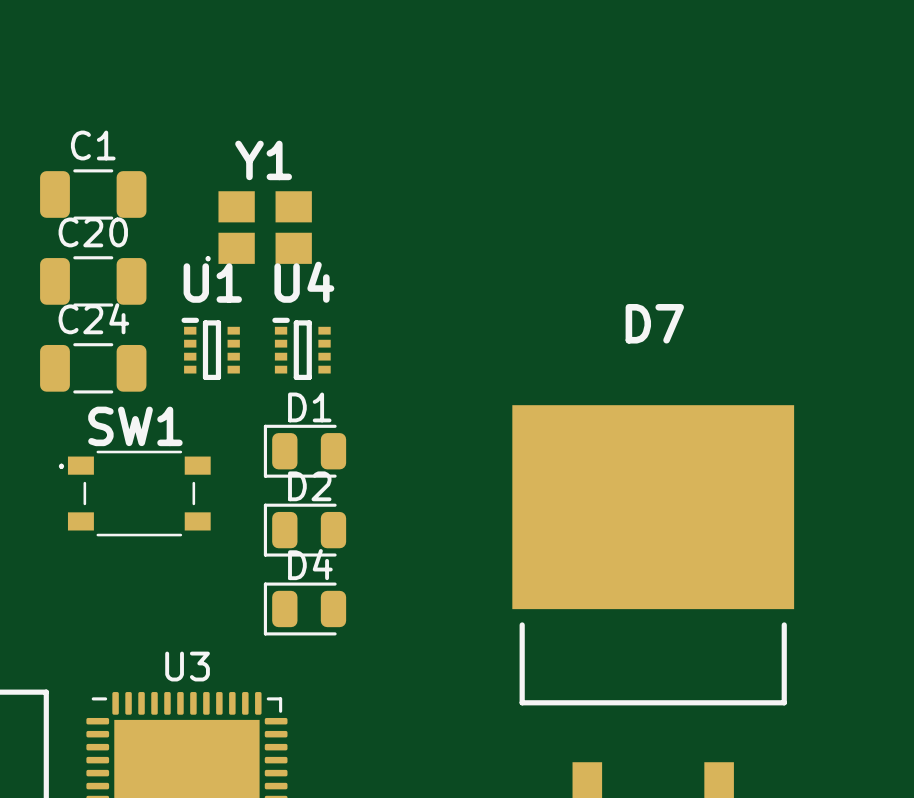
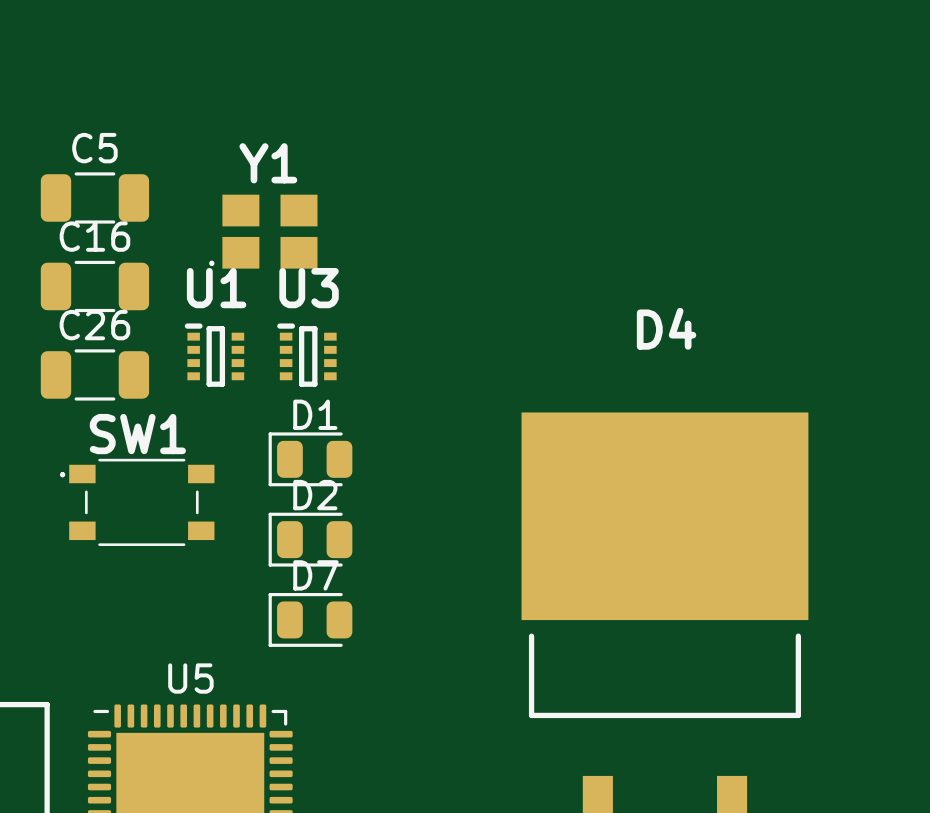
C1 name: C1 (93, 145) -> C5 (94, 148)
C20 name: C20 (93, 232) -> C16 (94, 236)
U4 name: U4 (304, 282) -> U3 (309, 288)
C24 name: C24 (93, 318) -> C26 (94, 325)
D7 name: D7 (654, 323) -> D4 (666, 328)
D4 name: D4 (310, 564) -> D7 (315, 575)
U3 name: U3 (187, 666) -> U5 (190, 678)

